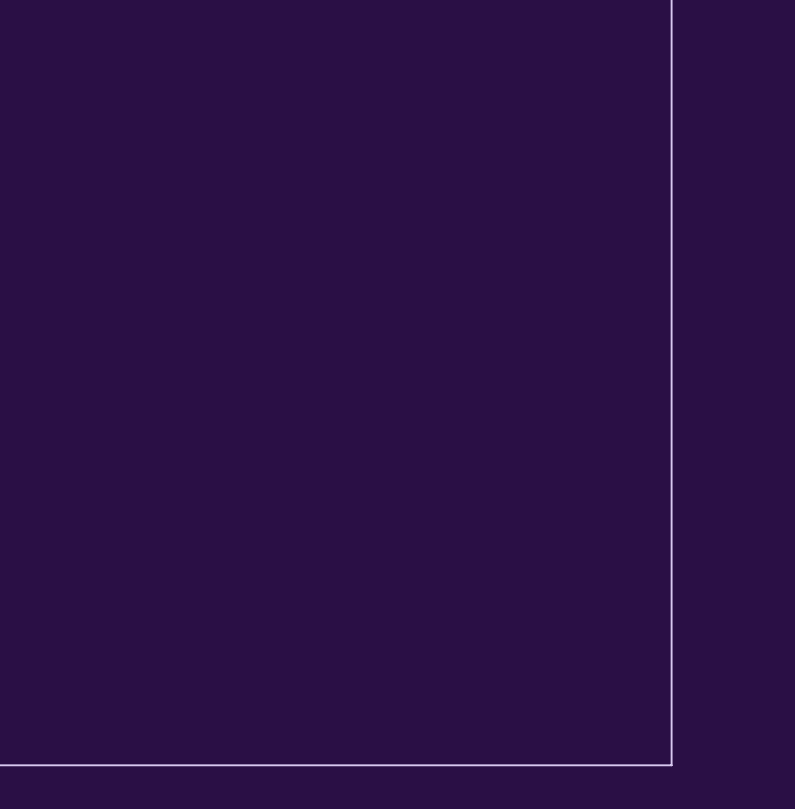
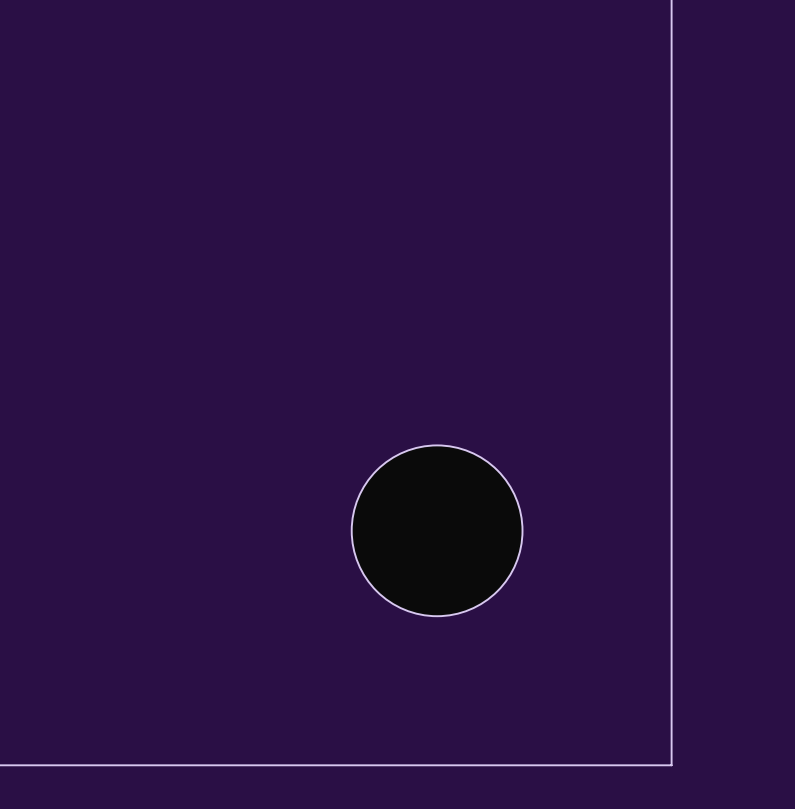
hole: none -> (437, 530)

